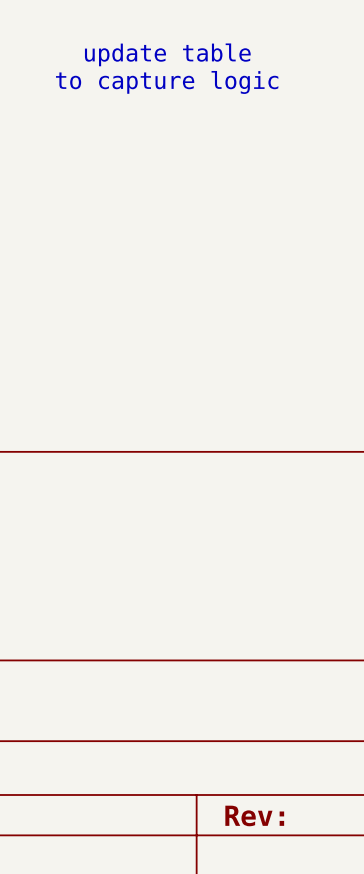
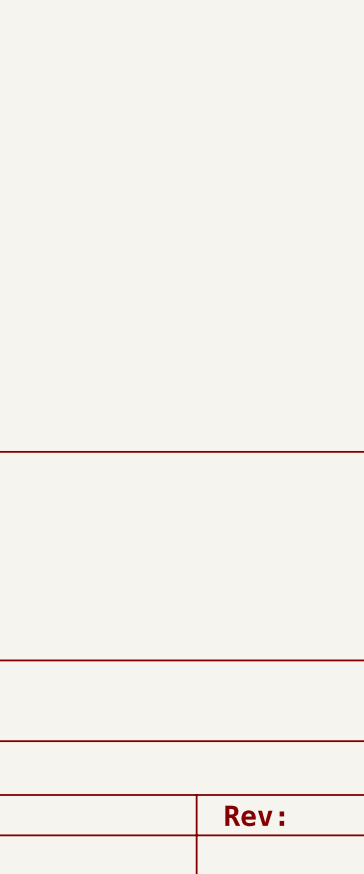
text: update table (167, 54) -> none
text: to capture logic (167, 82) -> none

